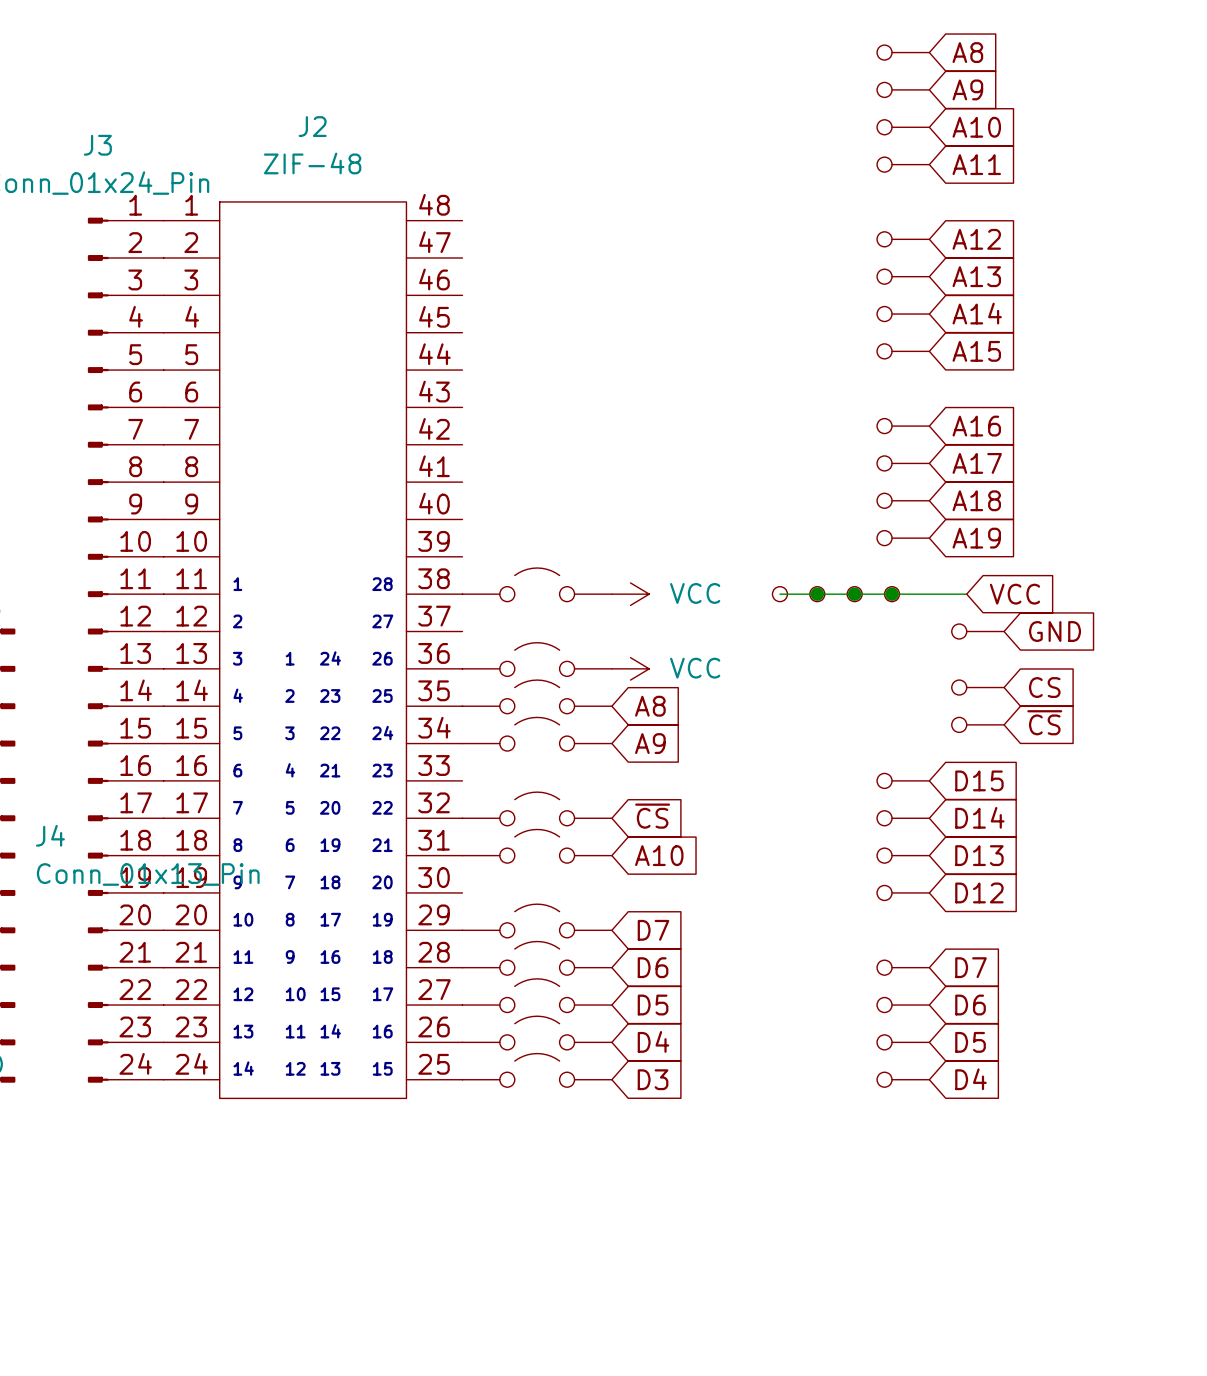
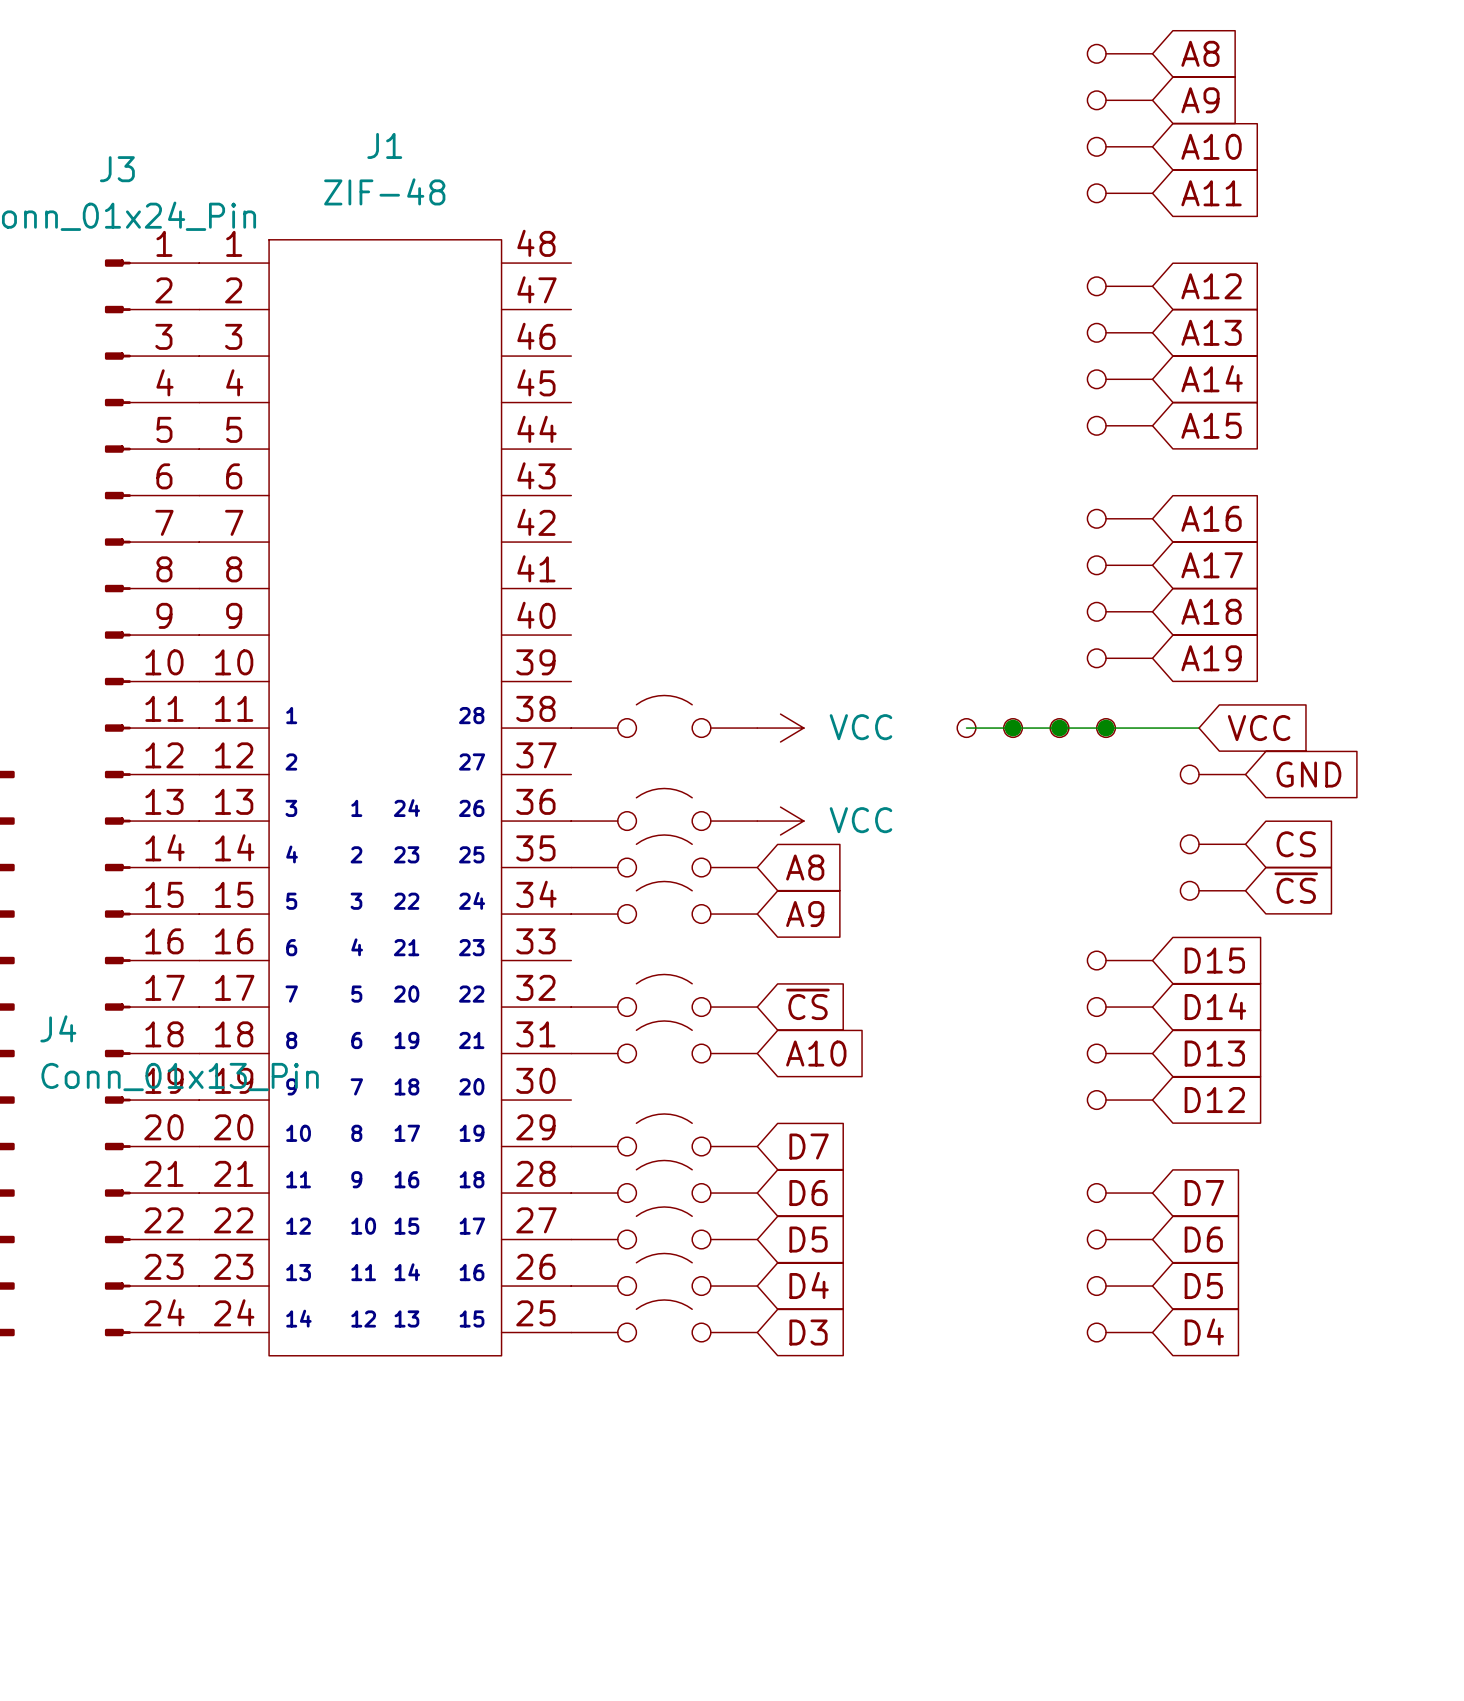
J2 name: J2 (312, 126) -> J1 (384, 145)

